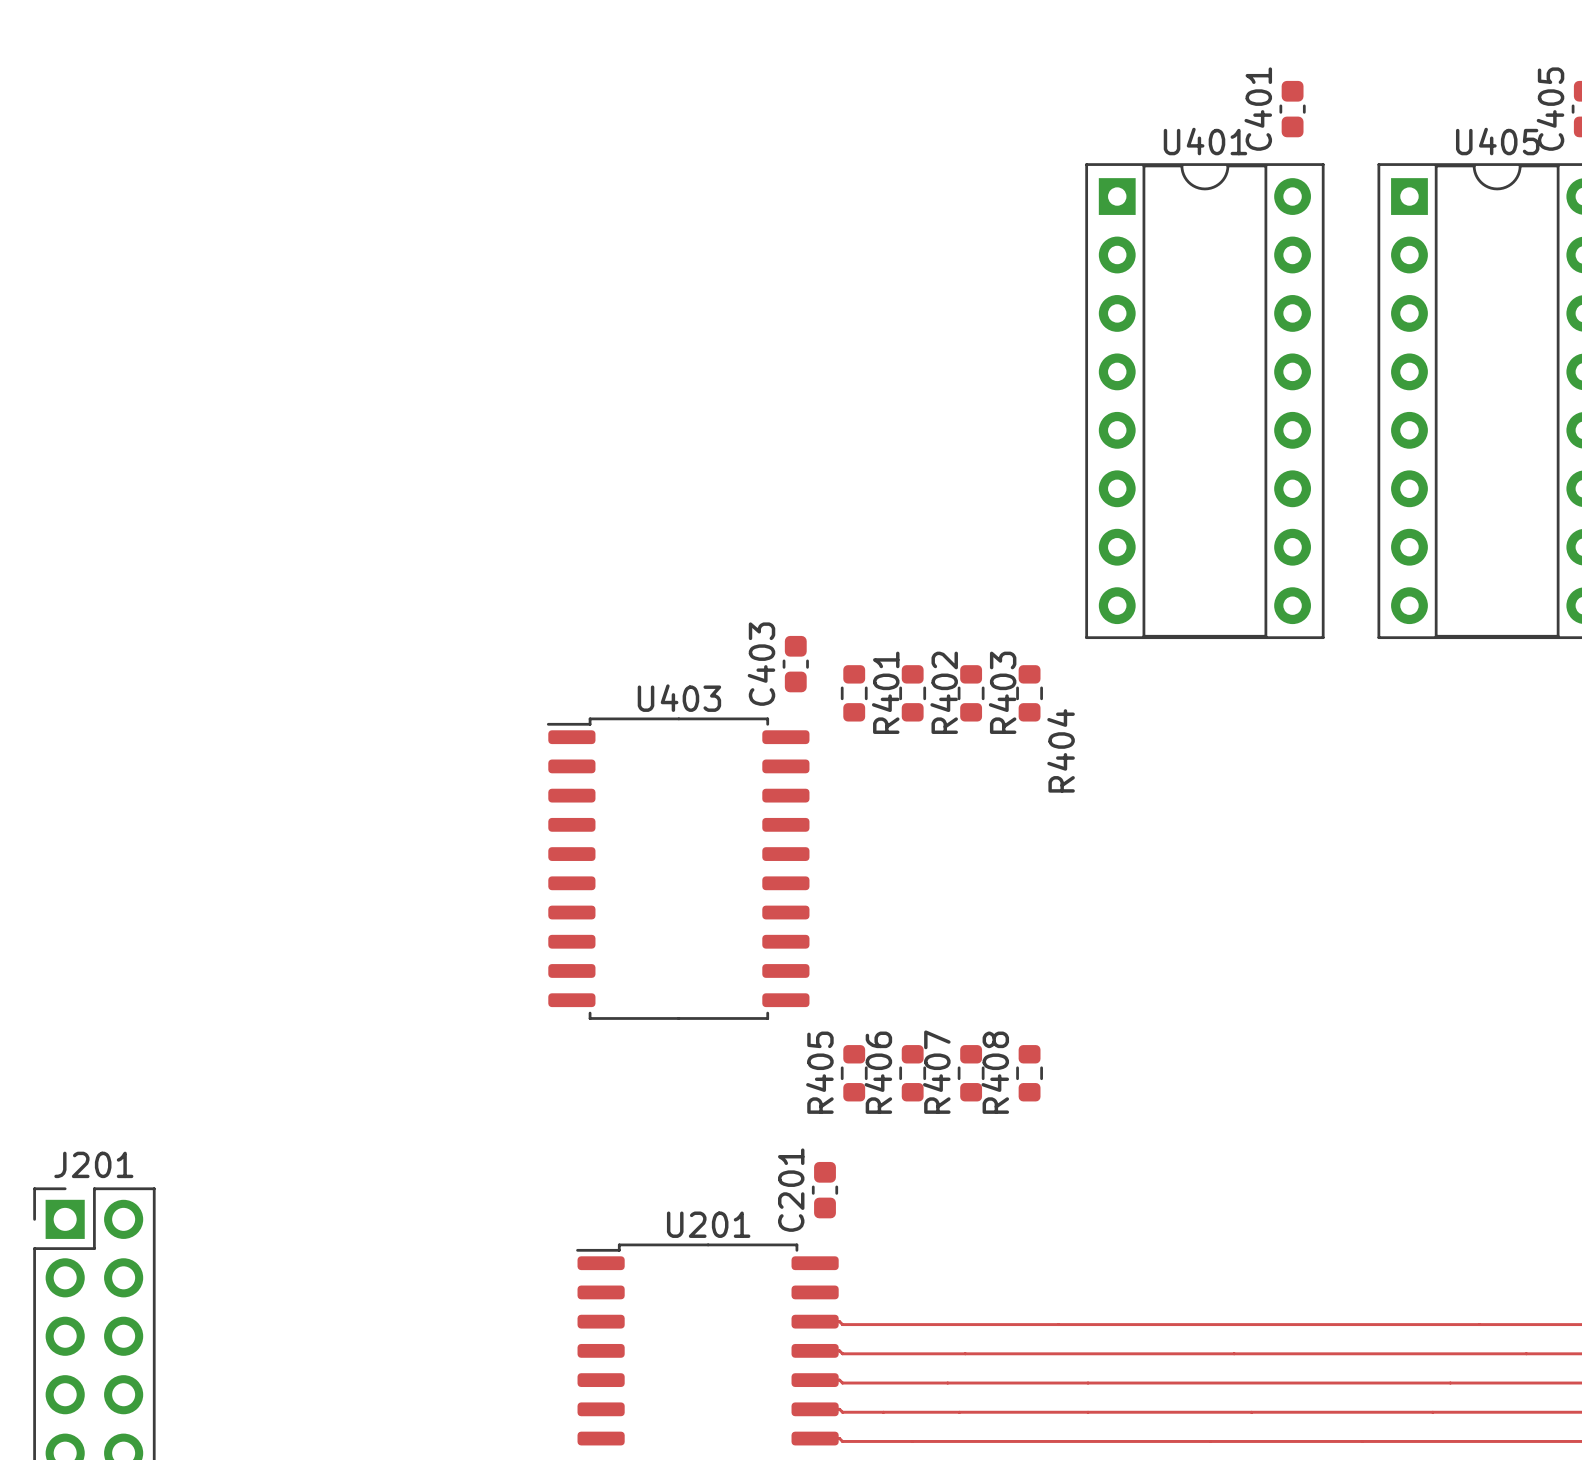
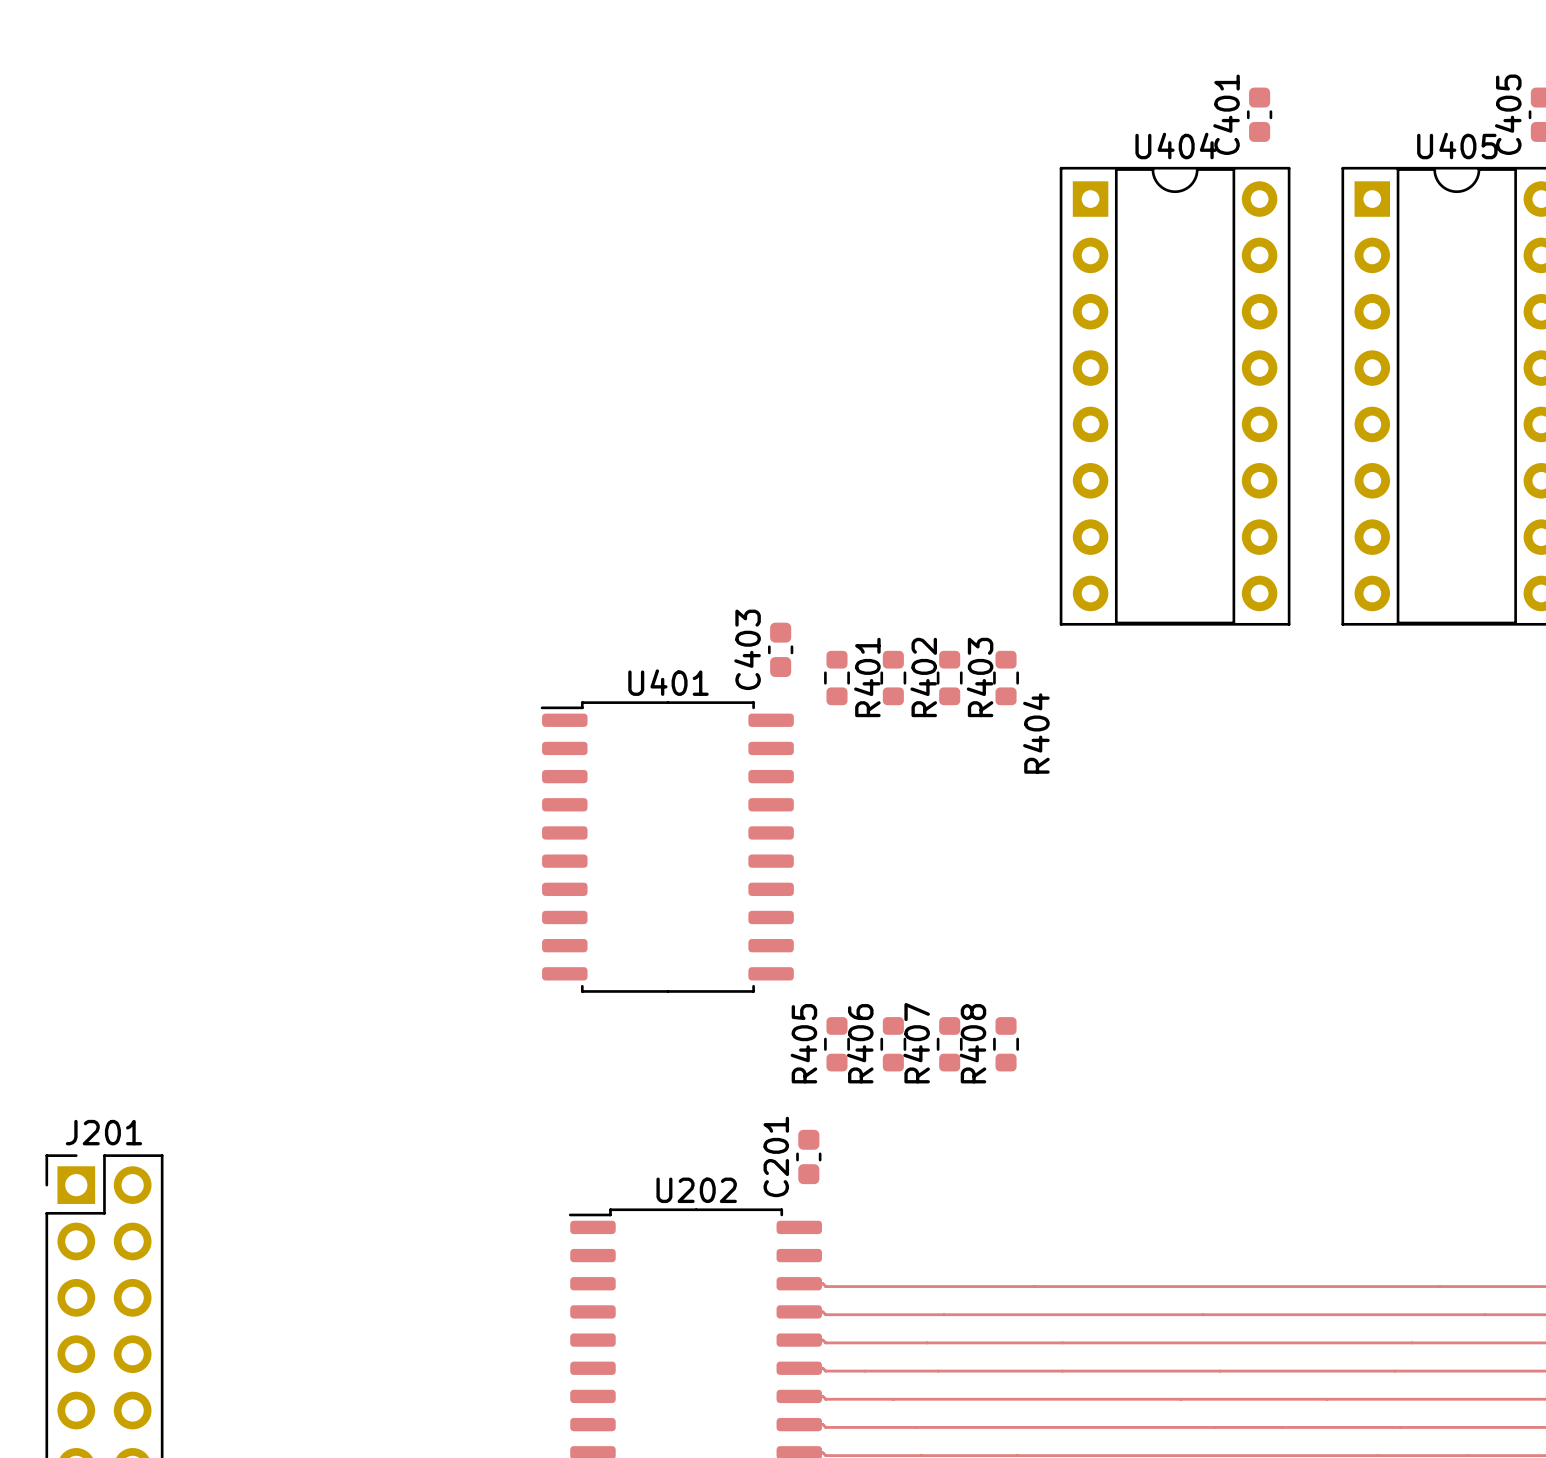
U401 name: U401 (1205, 141) -> U404 (1176, 146)
U403 name: U403 (679, 698) -> U401 (668, 682)
U201 name: U201 (708, 1224) -> U202 (696, 1190)

